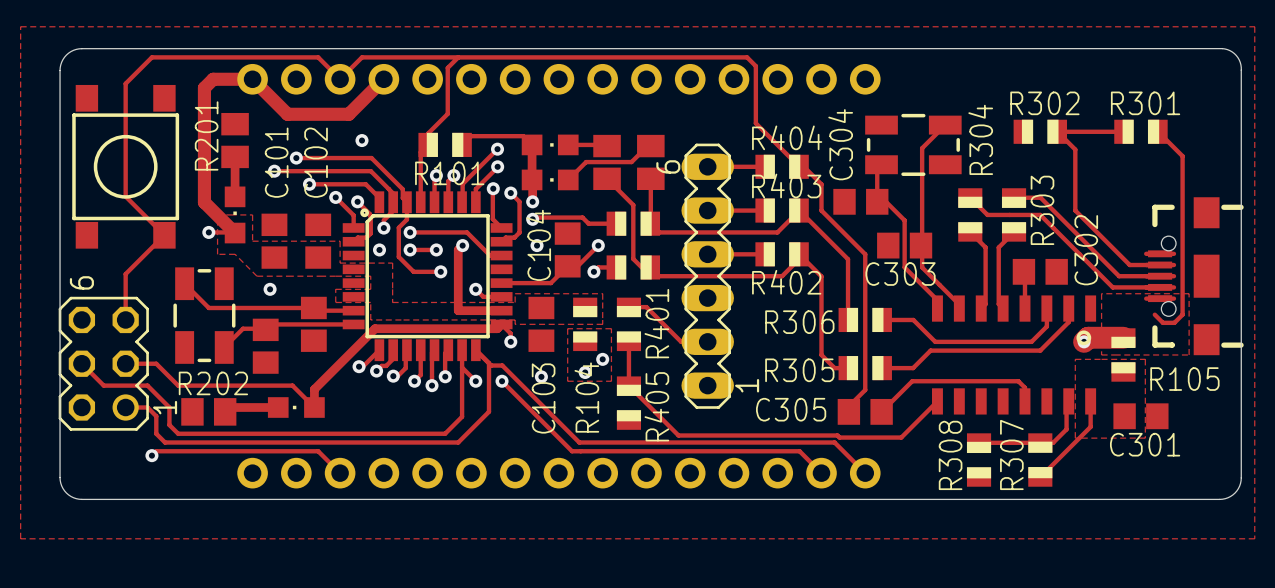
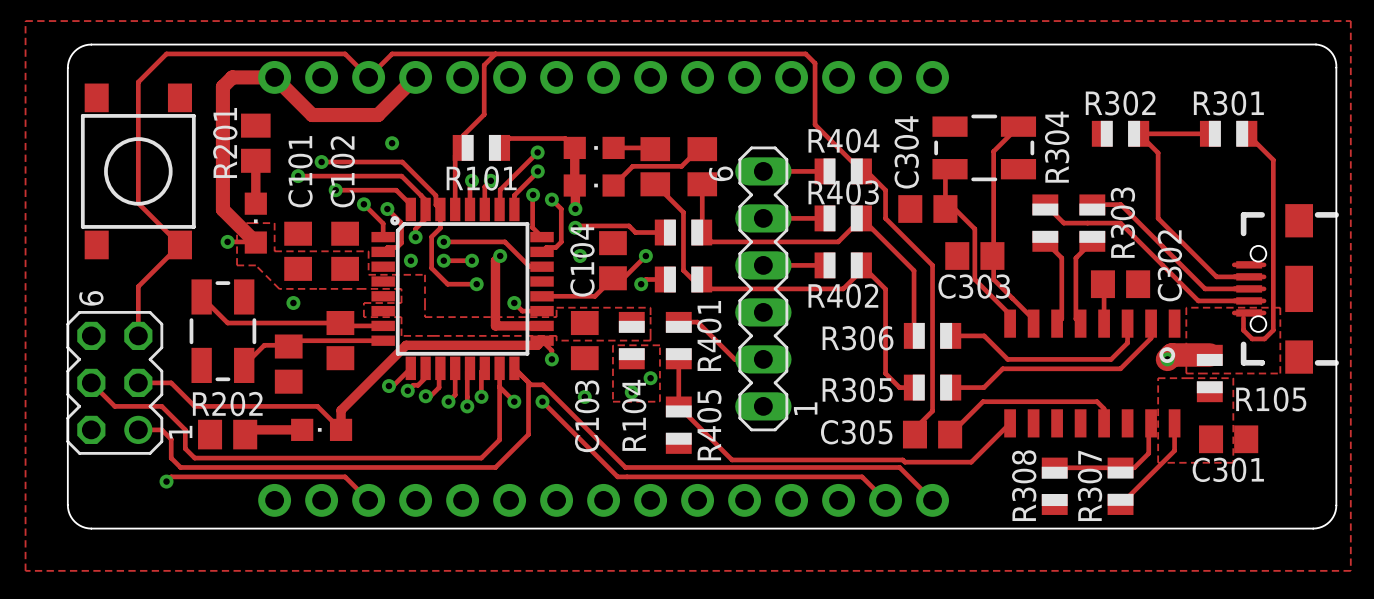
track: none -> (1243, 317) (1243, 330)

